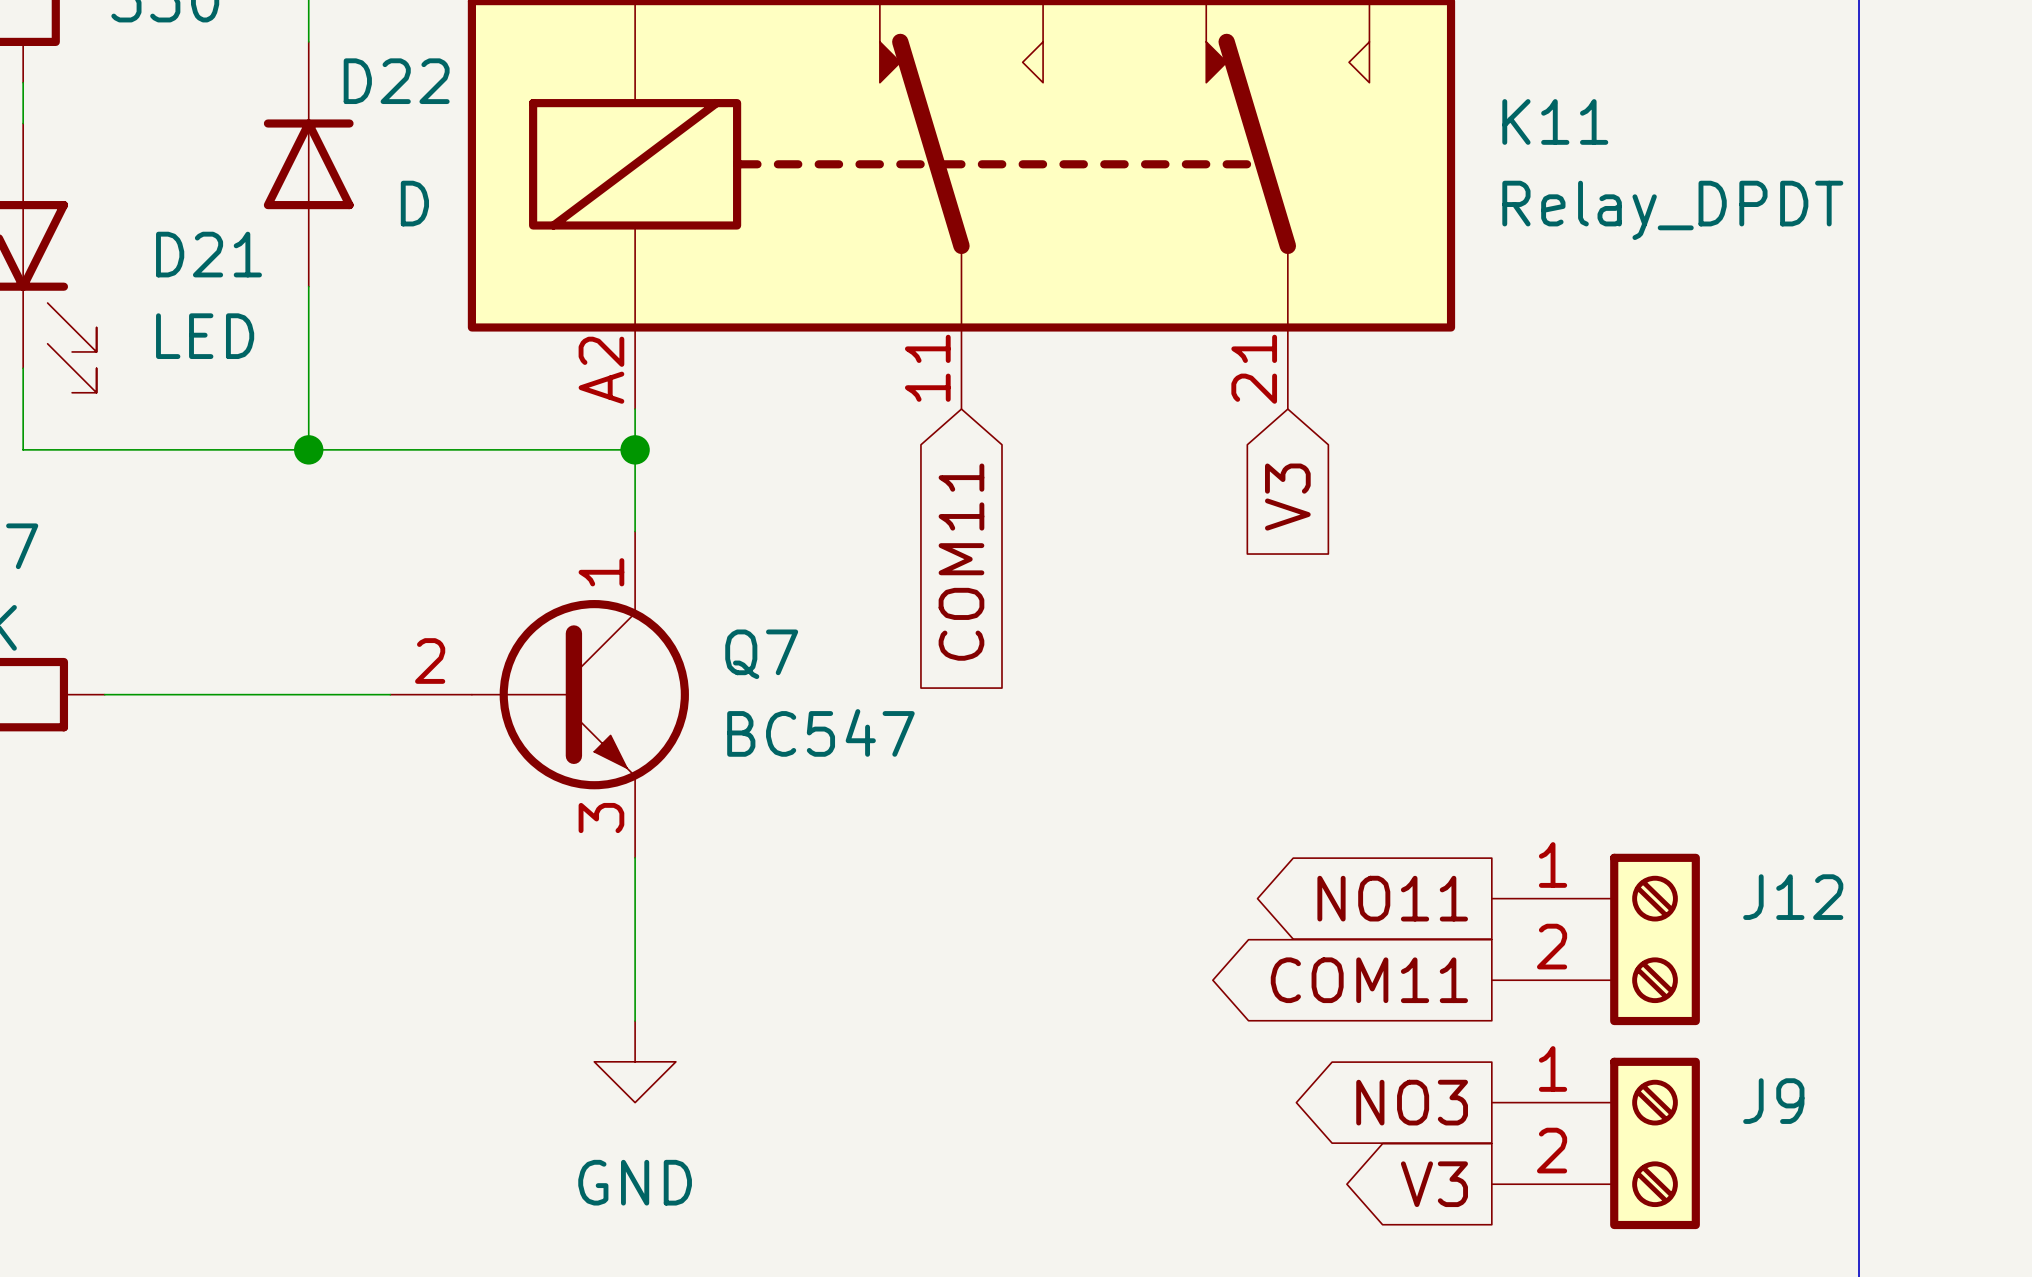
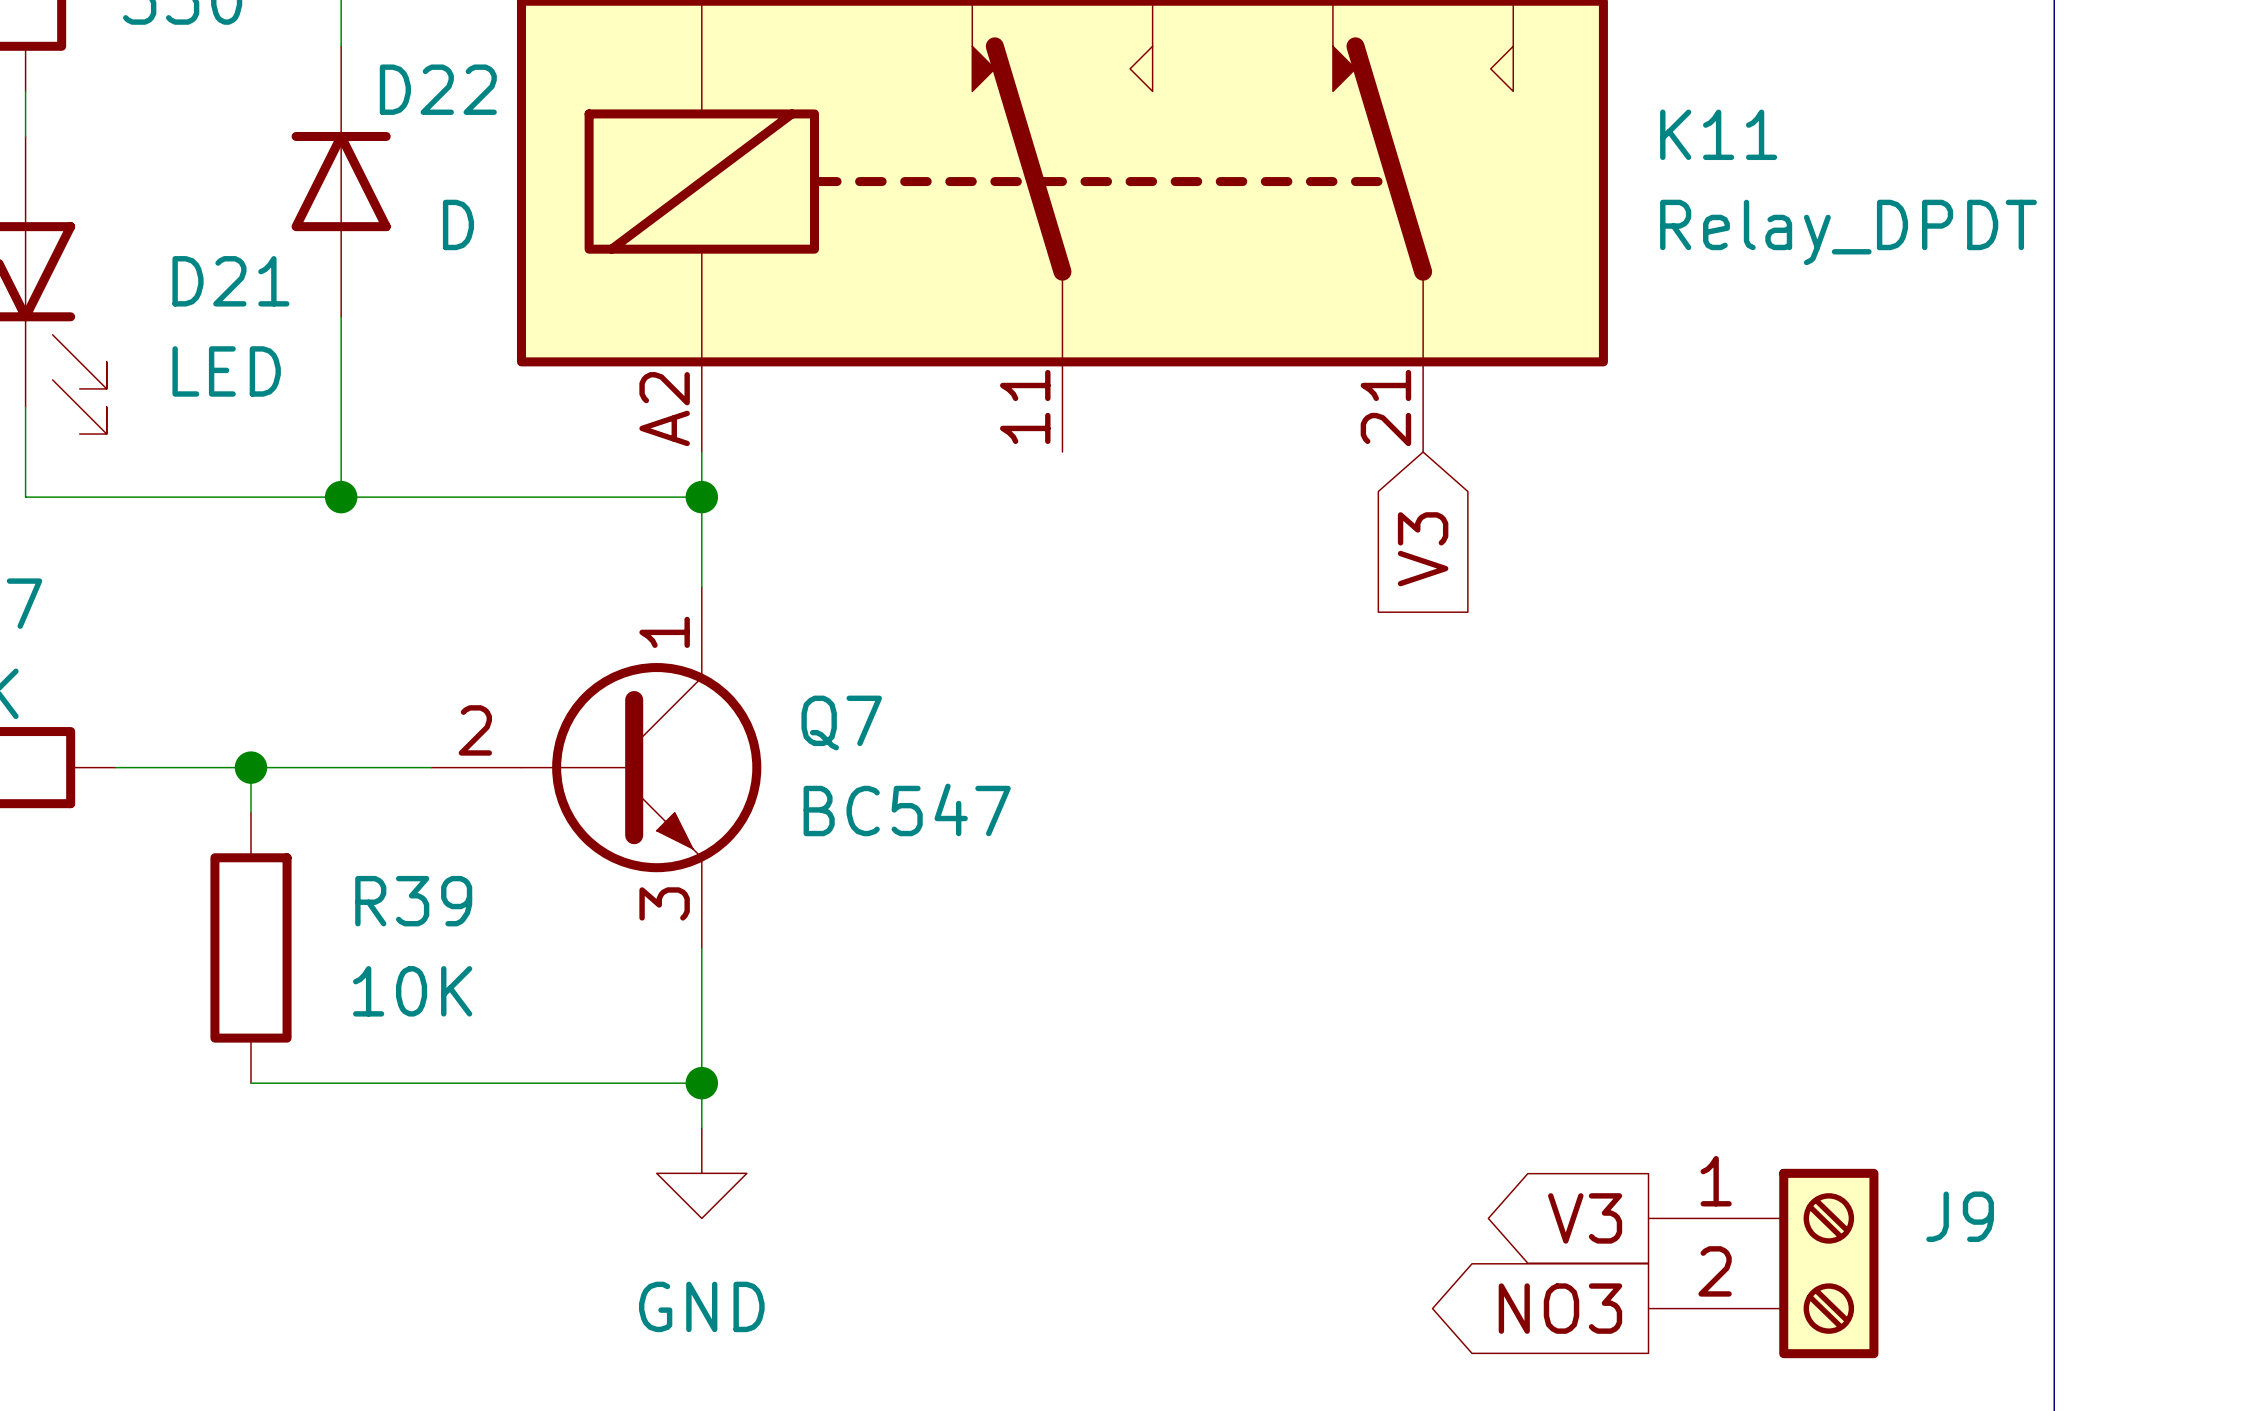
global label: COM11 (961, 562) -> none
wire: none -> (250, 767) (250, 812)
junction: none -> (250, 767)
R39: none -> 10K (250, 947)
global label: NO11 (1392, 898) -> none
J12: (1595, 939) -> none
wire: none -> (250, 1083) (701, 1083)
junction: none -> (701, 1083)
global label: COM11 (1369, 980) -> none
global label: NO3 (1412, 1102) -> V3 (1585, 1218)
global label: V3 (1434, 1184) -> NO3 (1560, 1308)

